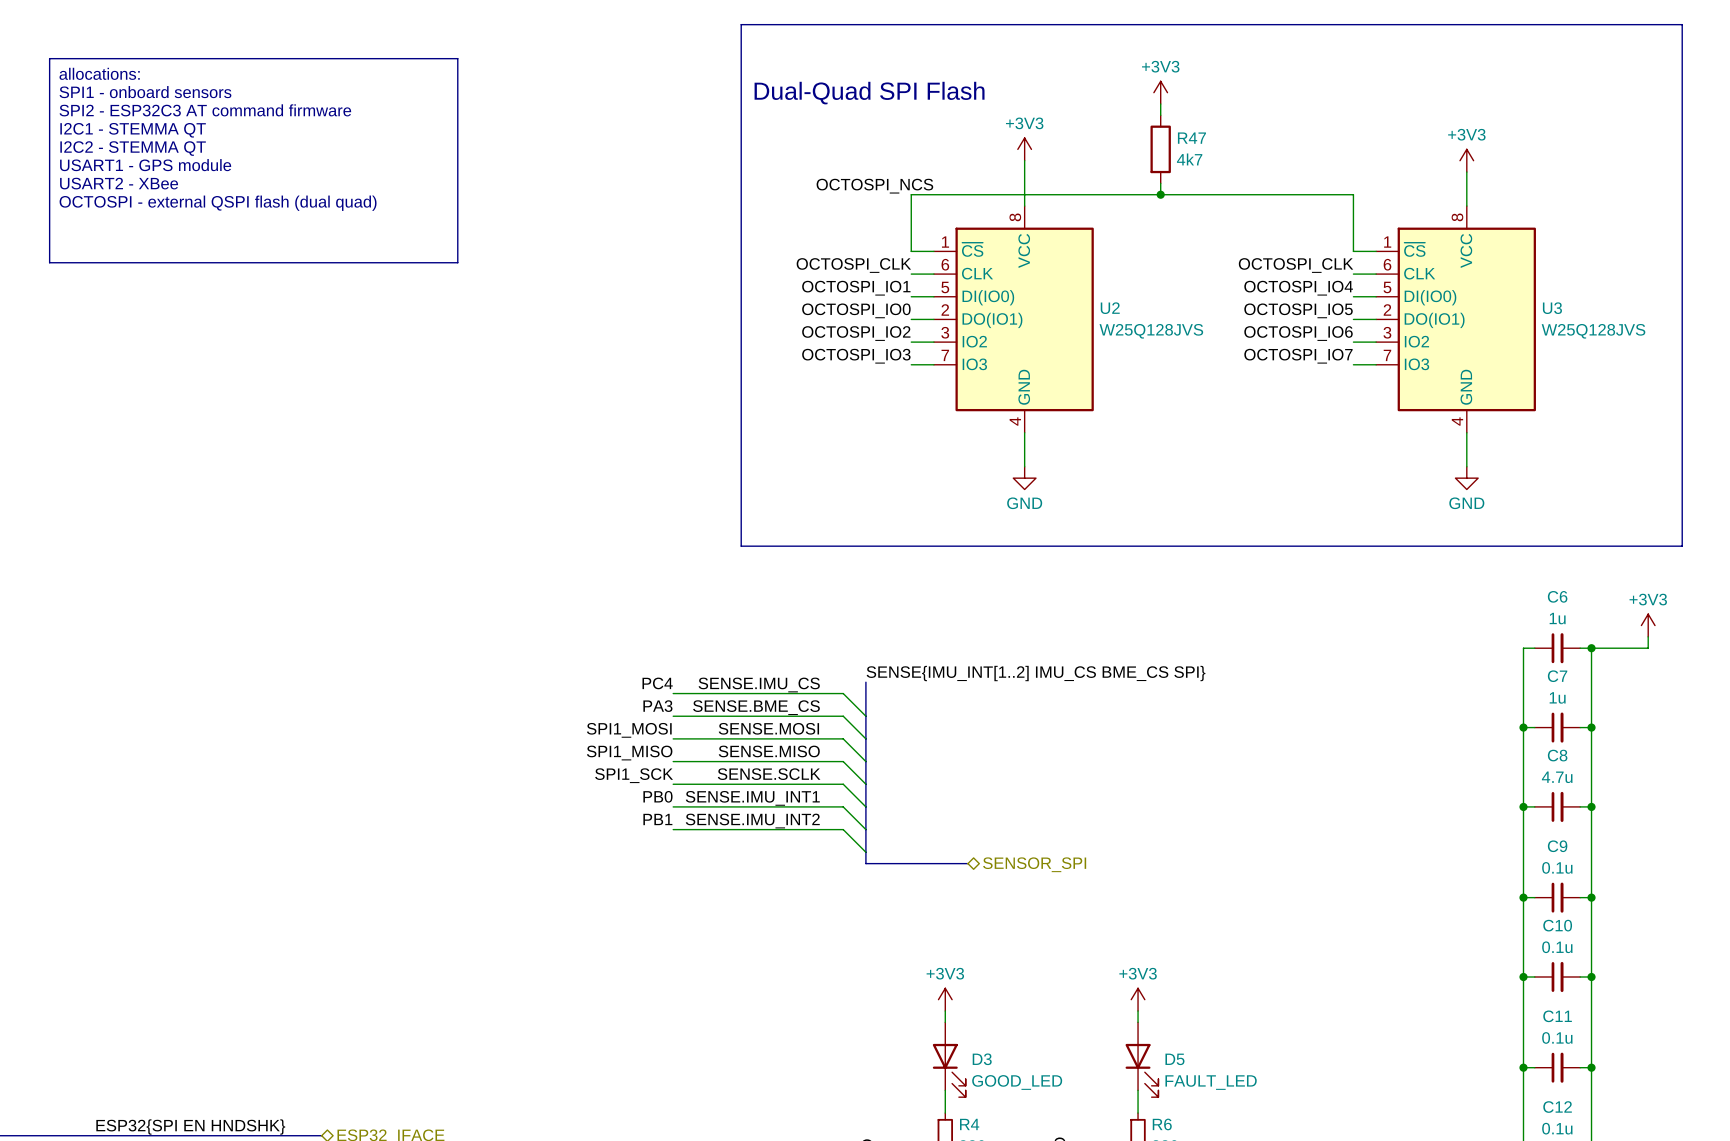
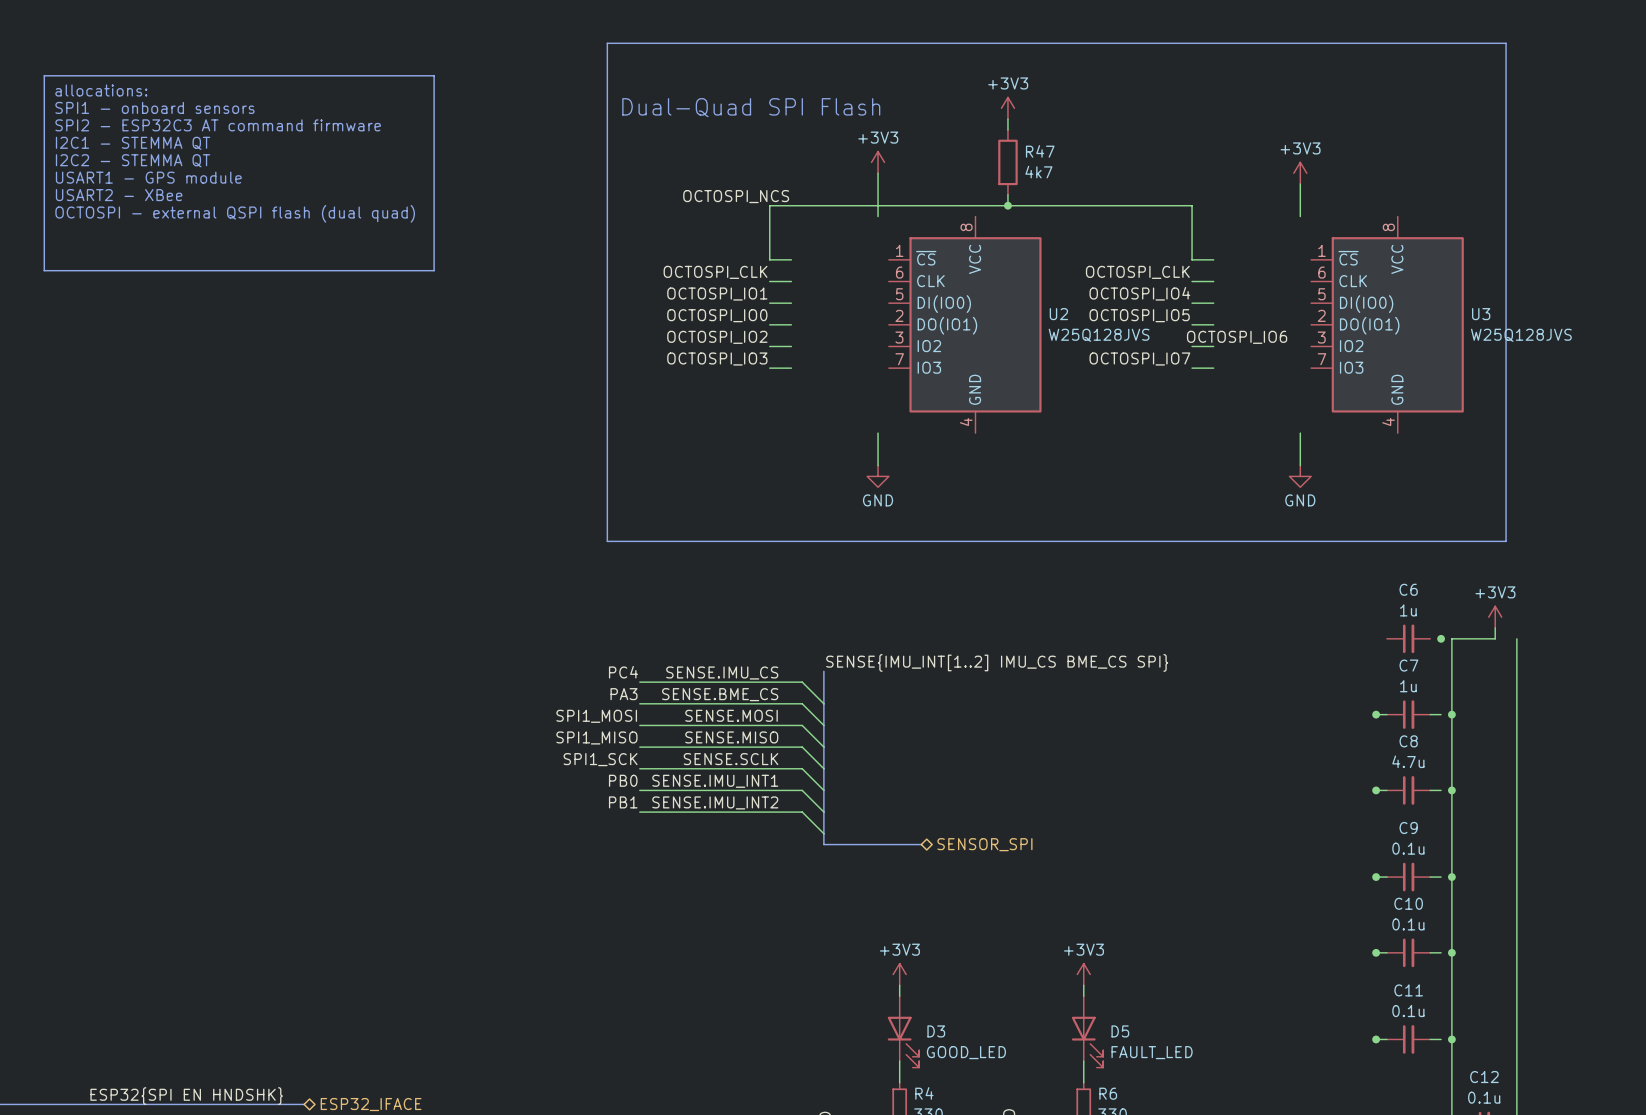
line: (741, 24) (741, 546) -> (704, 43) (607, 43) (607, 541) (704, 541)
line: (1580, 24) (1682, 24) (1682, 546) (1580, 546) -> (1506, 43) (1506, 541)
power symbol: none -> +3V3 (1007, 108)
power symbol: +3V3 (1160, 92) -> none
text position: Dual-Quad SPI Flash (869, 93) -> Dual-Quad SPI Flash (751, 107)
wire: (1160, 104) (1160, 115) -> (1007, 119) (1007, 129)
power symbol: none -> +3V3 (878, 162)
power symbol: +3V3 (1024, 149) -> none
R47 position: (1160, 149) -> (1007, 162)
wire: (1024, 160) (1024, 206) -> (878, 173) (878, 216)
power symbol position: +3V3 (1466, 160) -> +3V3 (1300, 173)
wire: (1466, 172) (1466, 206) -> (1300, 184) (1300, 216)
wire: (1160, 183) (1160, 194) -> (1007, 194) (1007, 205)
label position: OCTOSPI_NCS (874, 186) -> OCTOSPI_NCS (736, 196)
wire: (911, 194) (911, 251) (933, 251) -> (867, 205) (769, 205) (769, 259) (791, 259)
junction: none -> (1007, 205)
junction: (1160, 194) -> none
wire: (1251, 194) (1353, 194) (1353, 251) (1376, 251) -> (1192, 205) (1192, 259) (1213, 259)
label position: OCTOSPI_CLK (853, 265) -> OCTOSPI_CLK (715, 272)
label position: OCTOSPI_CLK (1296, 265) -> OCTOSPI_CLK (1137, 272)
wire: (911, 274) (933, 274) -> (769, 281) (791, 281)
wire: (1353, 274) (1376, 274) -> (1192, 281) (1213, 281)
label position: OCTOSPI_IO1 (856, 288) -> OCTOSPI_IO1 (717, 294)
label position: OCTOSPI_IO4 (1298, 288) -> OCTOSPI_IO4 (1139, 293)
wire: (911, 296) (933, 296) -> (769, 303) (791, 303)
wire: (1353, 296) (1376, 296) -> (1192, 303) (1213, 303)
label position: OCTOSPI_IO0 (856, 310) -> OCTOSPI_IO0 (717, 315)
label position: OCTOSPI_IO5 (1298, 310) -> OCTOSPI_IO5 (1139, 315)
wire: (911, 319) (933, 319) -> (769, 324) (791, 324)
wire: (1353, 319) (1376, 319) -> (1192, 324) (1213, 324)
label position: OCTOSPI_IO2 (856, 333) -> OCTOSPI_IO2 (717, 337)
wire: (911, 342) (933, 342) -> (769, 346) (791, 346)
wire: (1353, 342) (1376, 342) -> (1192, 346) (1213, 346)
label position: OCTOSPI_IO3 (856, 356) -> OCTOSPI_IO3 (717, 358)
label position: OCTOSPI_IO7 (1298, 356) -> OCTOSPI_IO7 (1139, 358)
wire: (911, 364) (933, 364) -> (769, 368) (791, 368)
wire: (1353, 364) (1376, 364) -> (1192, 368) (1213, 368)
wire: (1024, 432) (1024, 466) -> (878, 433) (878, 465)
wire: (1466, 432) (1466, 466) -> (1300, 433) (1300, 465)
power symbol position: GND (1024, 478) -> GND (878, 476)
power symbol position: GND (1466, 478) -> GND (1300, 476)
power symbol position: +3V3 (1648, 625) -> +3V3 (1495, 617)
wire: none -> (1495, 628) (1495, 638) (1462, 638)
wire: (1648, 636) (1648, 648) (1580, 648) -> none
junction: none -> (1441, 638)
C6 position: (1557, 648) -> (1408, 638)
junction: (1591, 648) -> none
junction: none -> (1376, 714)
wire: (1523, 727) (1534, 727) -> (1376, 714) (1386, 714)
C7 position: (1557, 727) -> (1408, 714)
wire: (1580, 727) (1591, 727) -> (1430, 714) (1441, 714)
junction: (1591, 727) -> none
junction: none -> (1376, 790)
wire: (1523, 806) (1534, 806) -> (1376, 790) (1386, 790)
C8 position: (1557, 806) -> (1408, 790)
wire: (1580, 806) (1591, 806) -> (1430, 790) (1441, 790)
junction: (1591, 806) -> none
junction: none -> (1376, 877)
wire: (1523, 897) (1534, 897) -> (1376, 877) (1386, 877)
C9 position: (1557, 897) -> (1408, 877)
wire: (1580, 897) (1591, 897) -> (1430, 877) (1441, 877)
junction: (1591, 897) -> none
junction: none -> (1376, 952)
wire: (1523, 976) (1534, 976) -> (1376, 952) (1386, 952)
C10 position: (1557, 976) -> (1408, 952)
wire: (1580, 976) (1591, 976) -> (1430, 952) (1441, 952)
junction: (1591, 976) -> none
junction: none -> (1376, 1039)
wire: (1523, 1067) (1534, 1067) -> (1376, 1039) (1386, 1039)
C11 position: (1557, 1067) -> (1408, 1039)
wire: (1580, 1067) (1591, 1067) -> (1430, 1039) (1441, 1039)
junction: (1591, 1067) -> none

